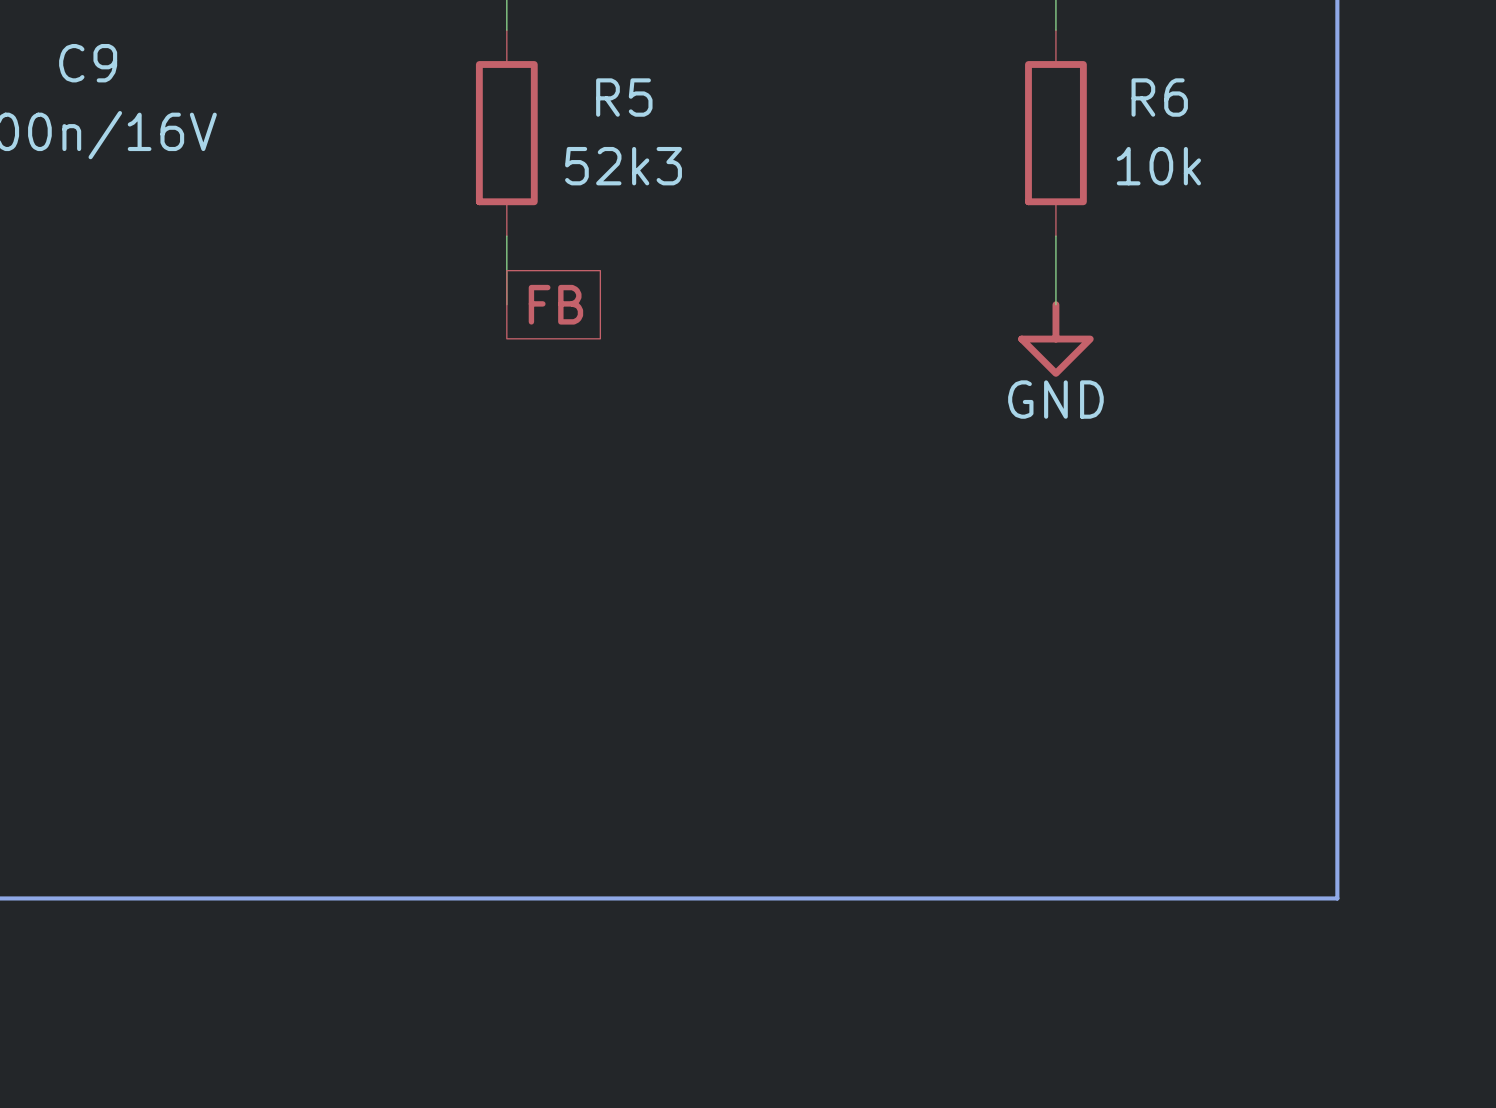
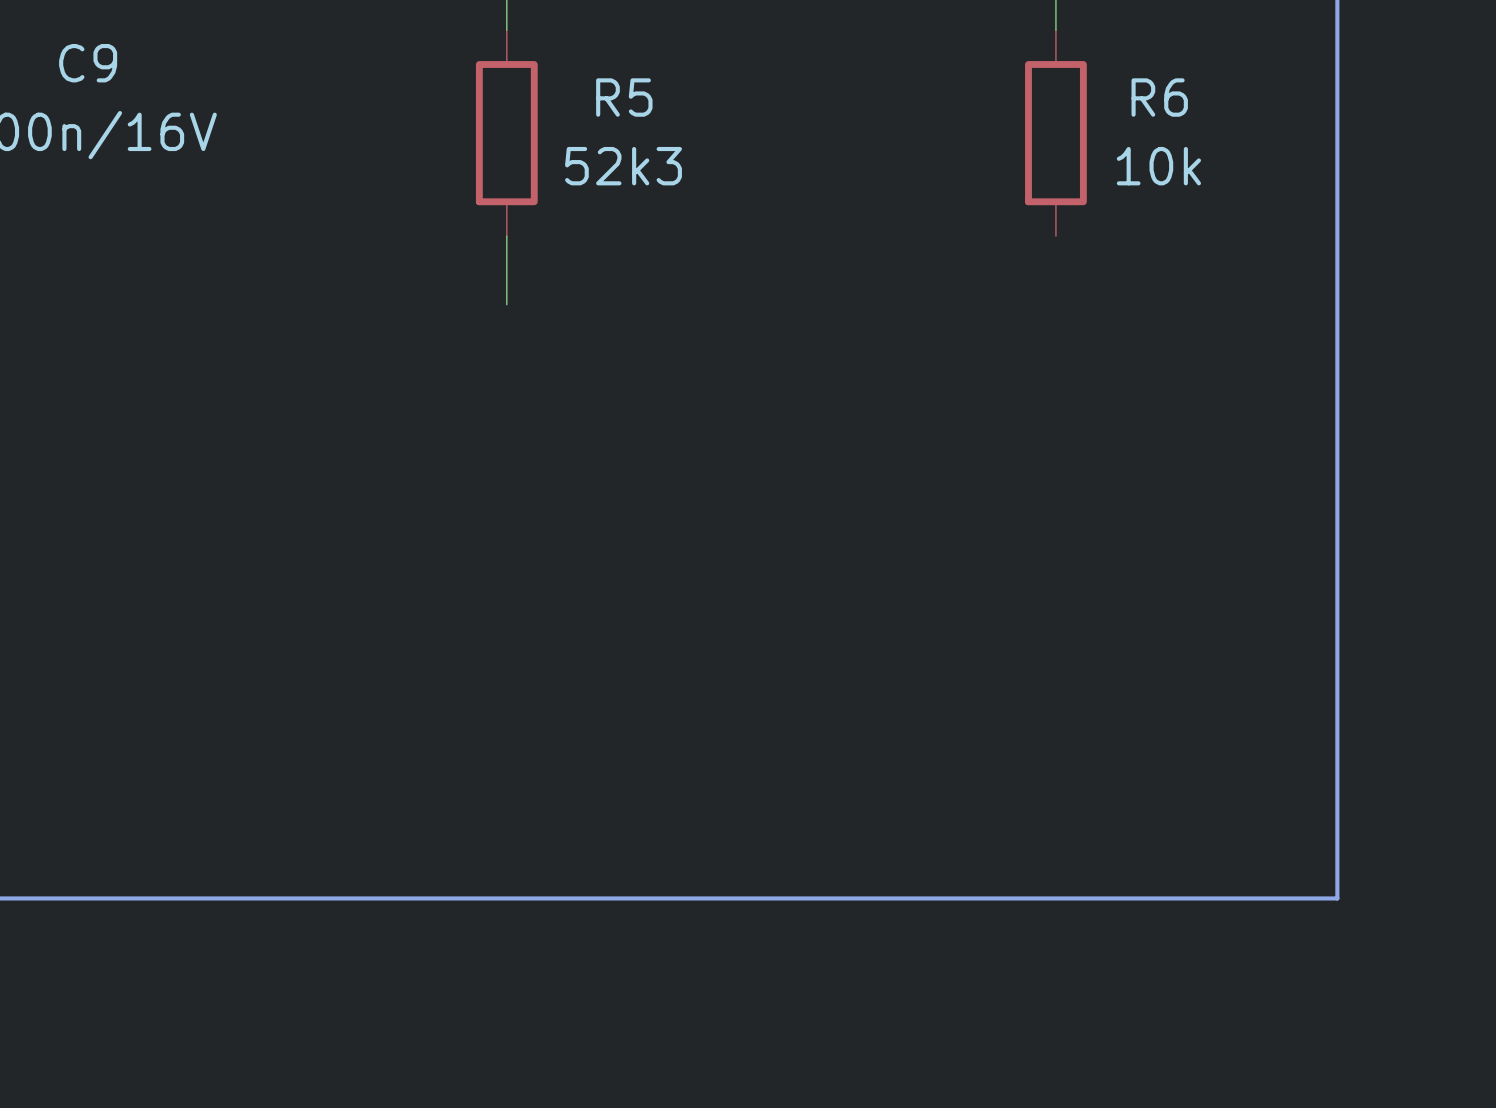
wire: (1055, 236) (1055, 304) -> none
global label: FB (555, 304) -> none
power symbol: GND (1055, 339) -> none

